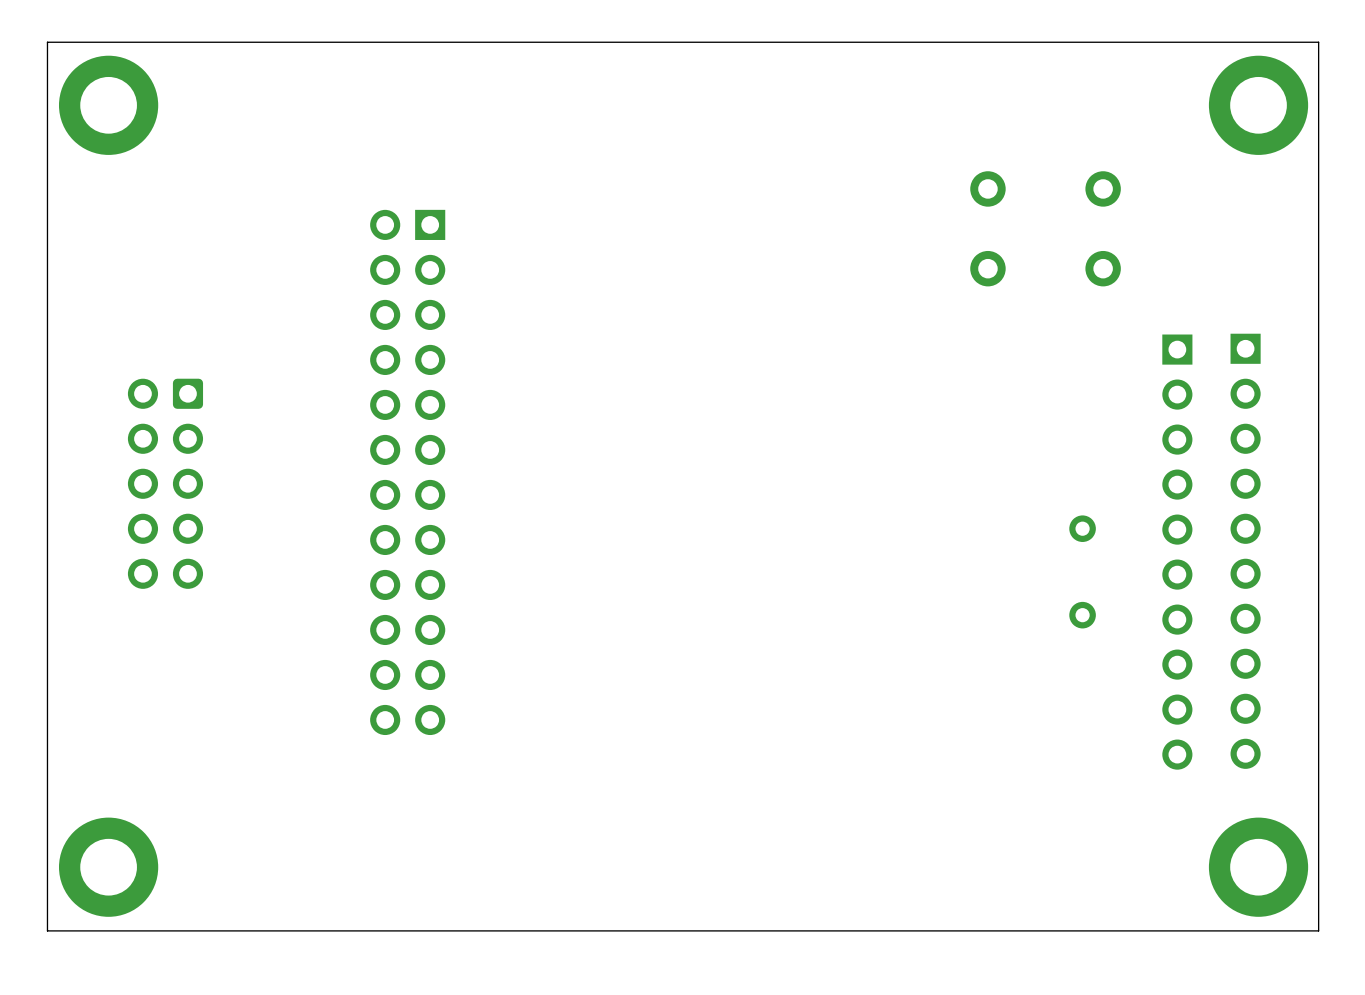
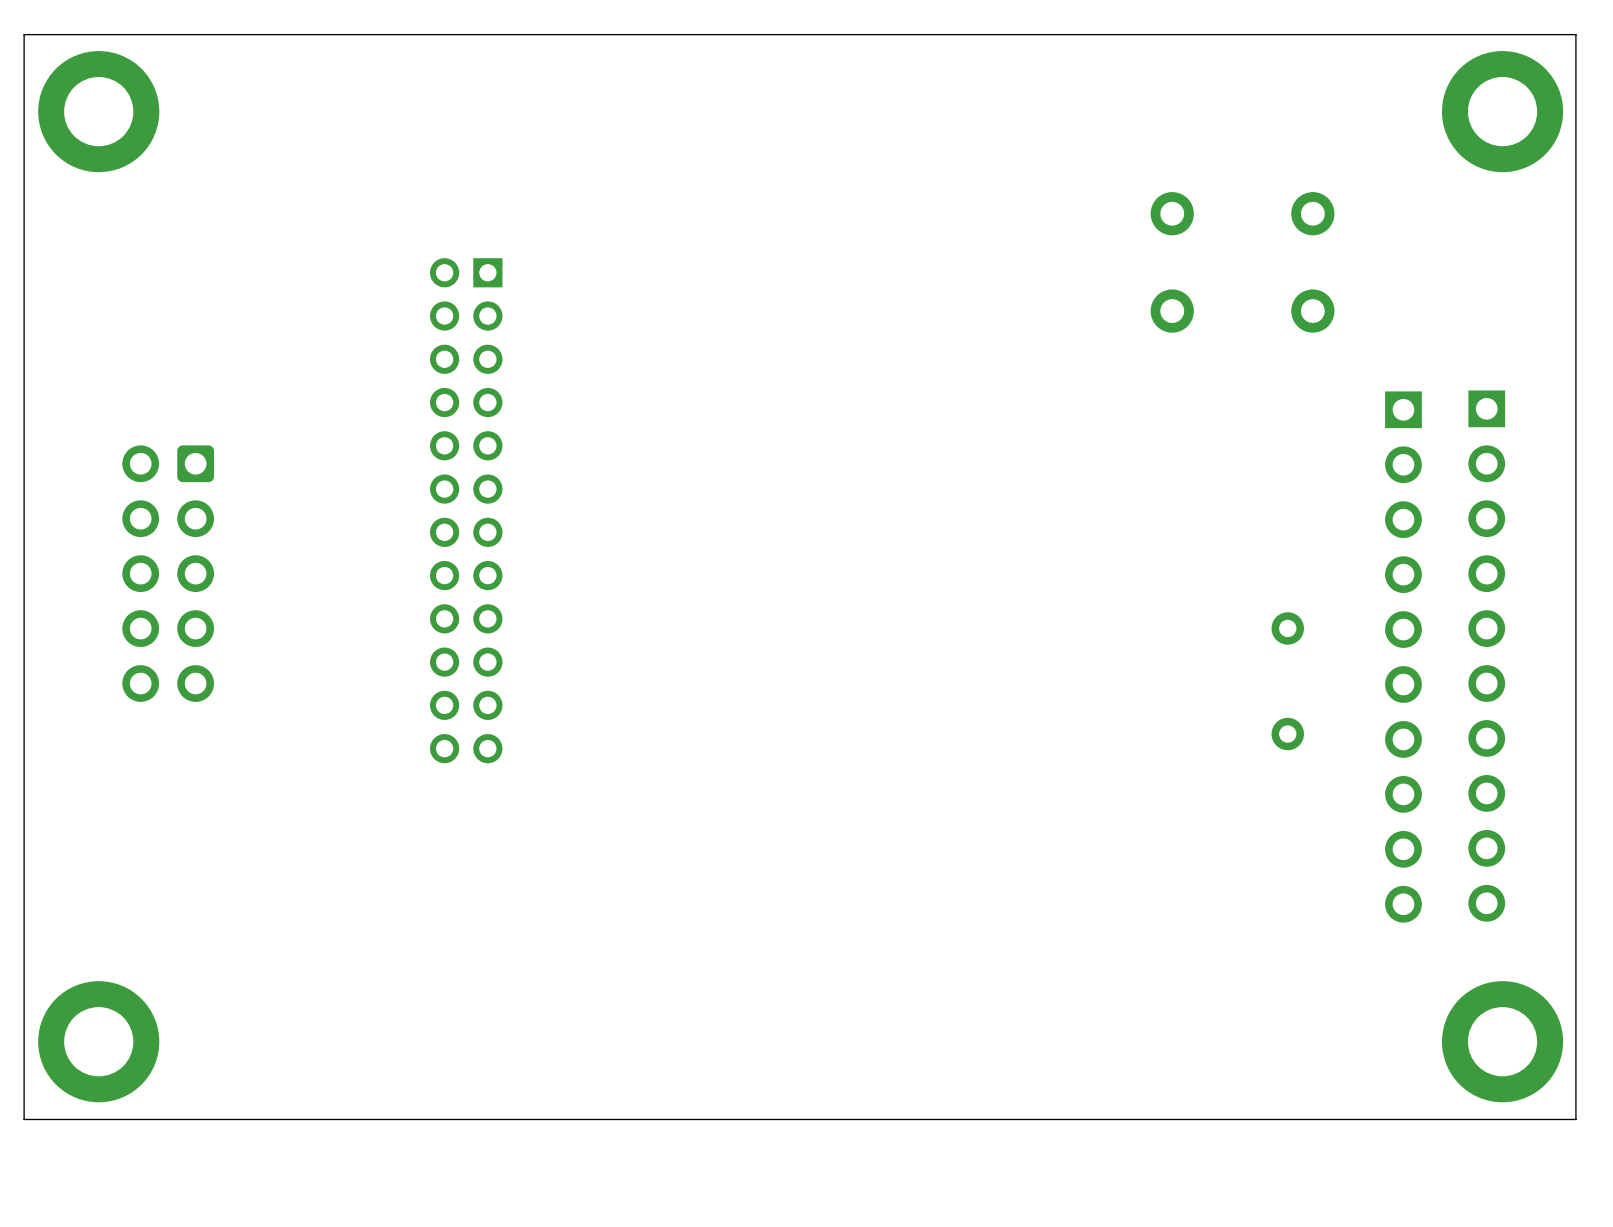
part: none -> (466, 510)
part: (407, 472) -> none

